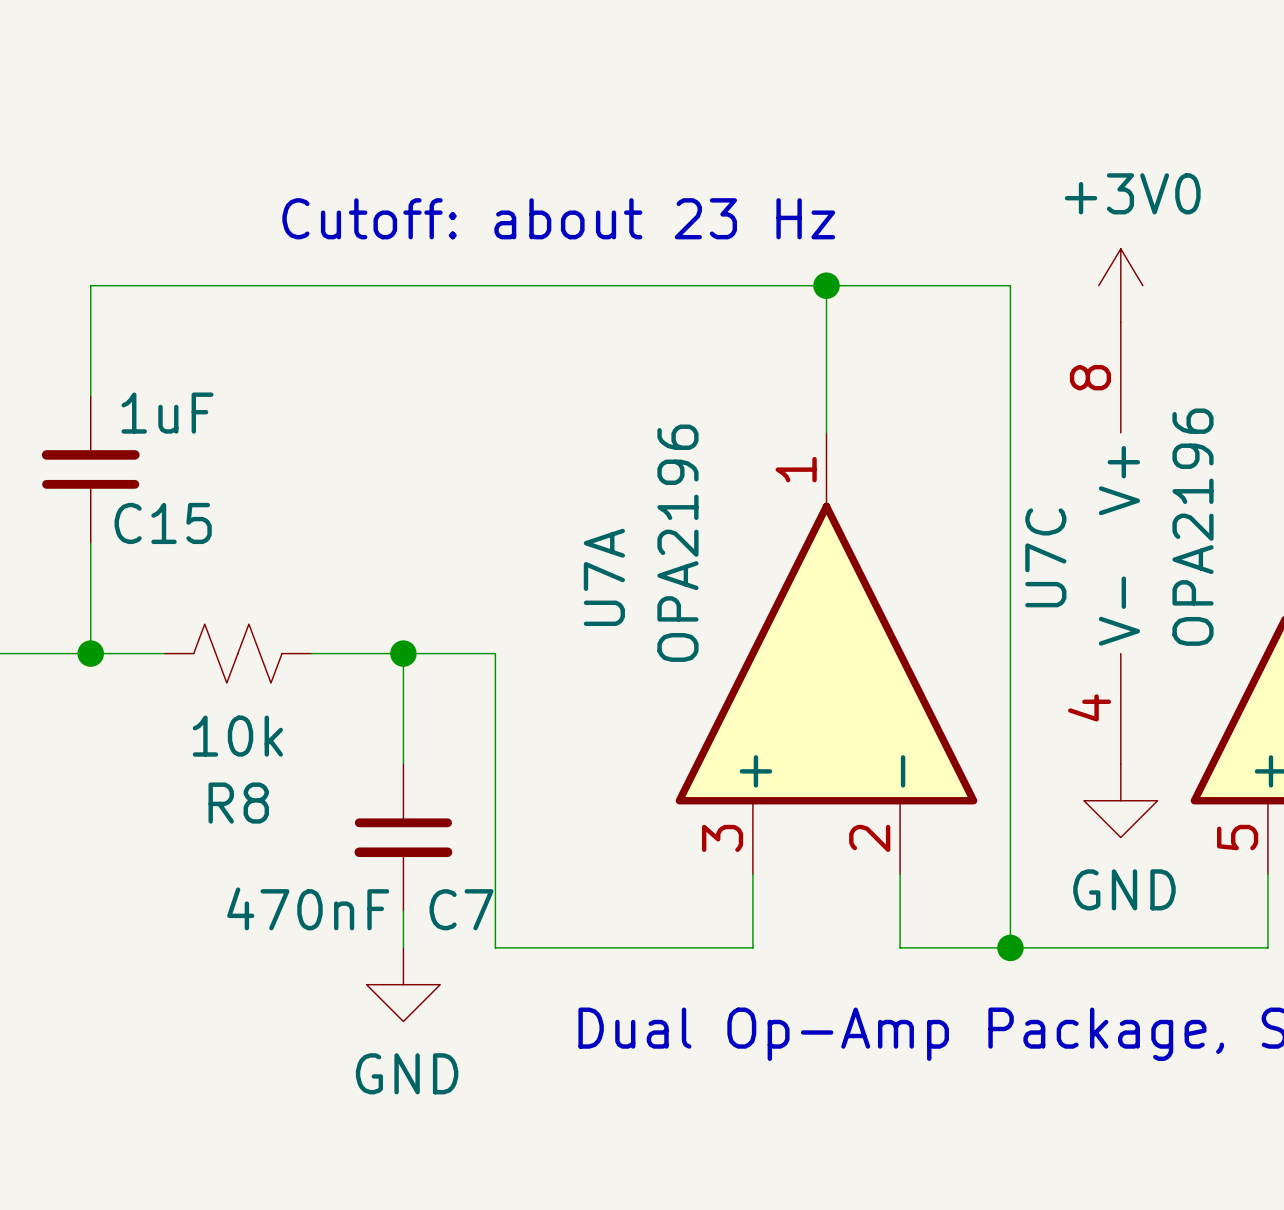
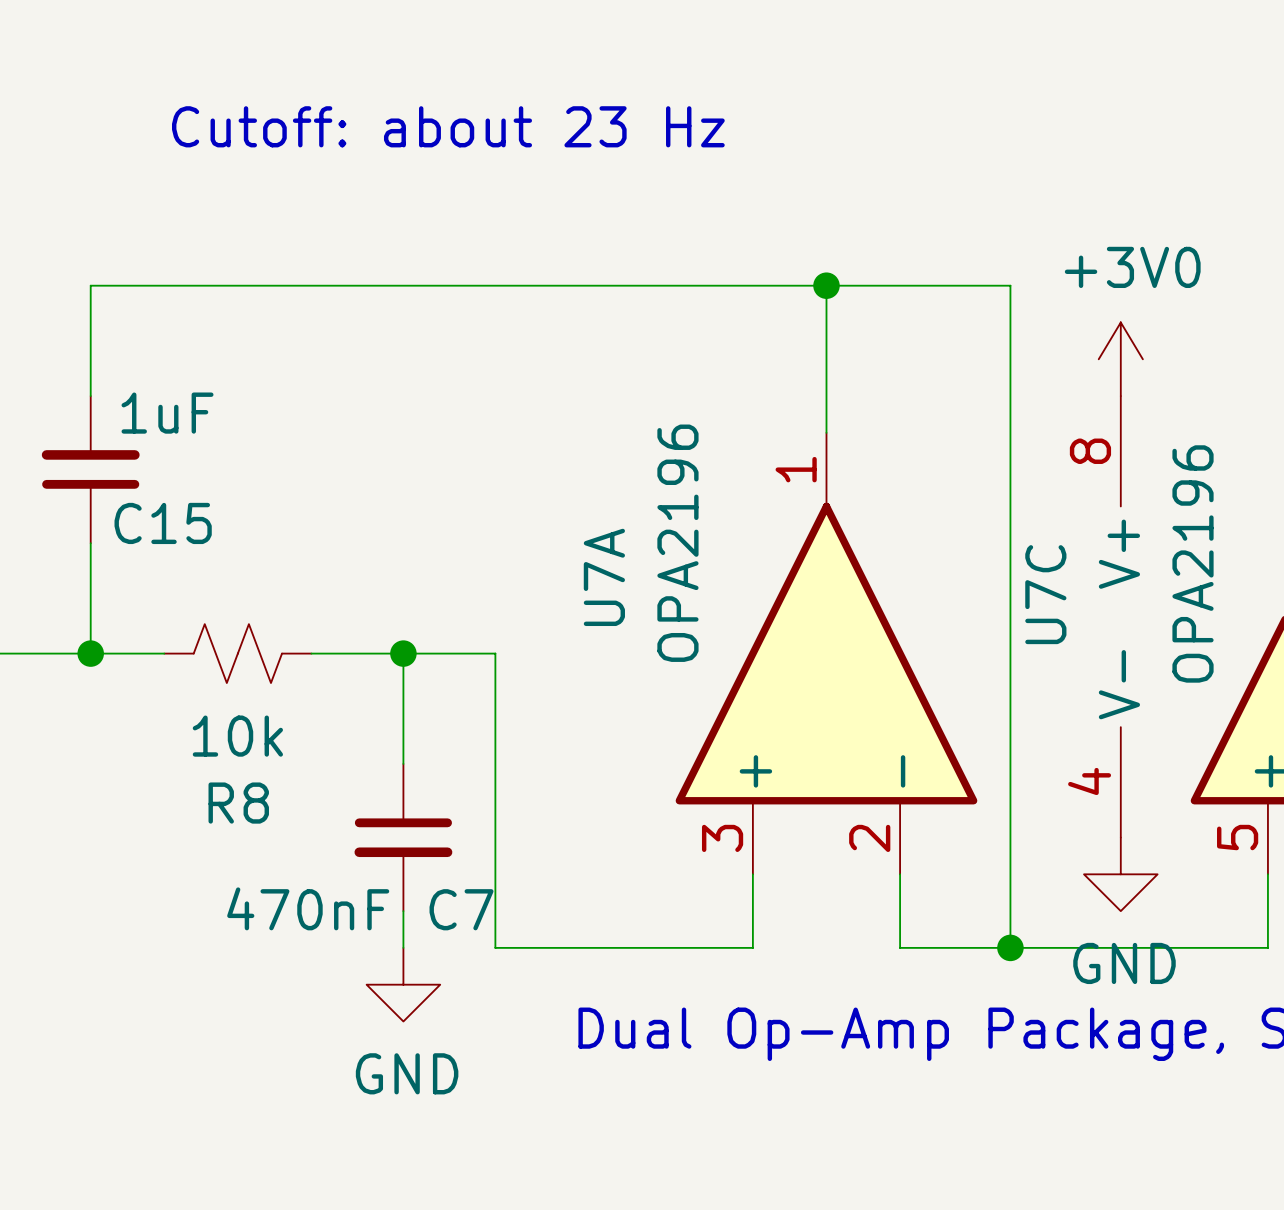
text position: Cutoff: about 23 Hz (558, 218) -> Cutoff: about 23 Hz (448, 126)
power symbol position: +3V0 (1120, 285) -> +3V0 (1120, 359)
U7C value position: OPA2196 (1193, 527) -> OPA2196 (1193, 563)
U7C position: (1120, 543) -> (1120, 616)
U7C name position: U7C (1045, 557) -> U7C (1045, 594)
power symbol position: GND (1120, 800) -> GND (1120, 874)

